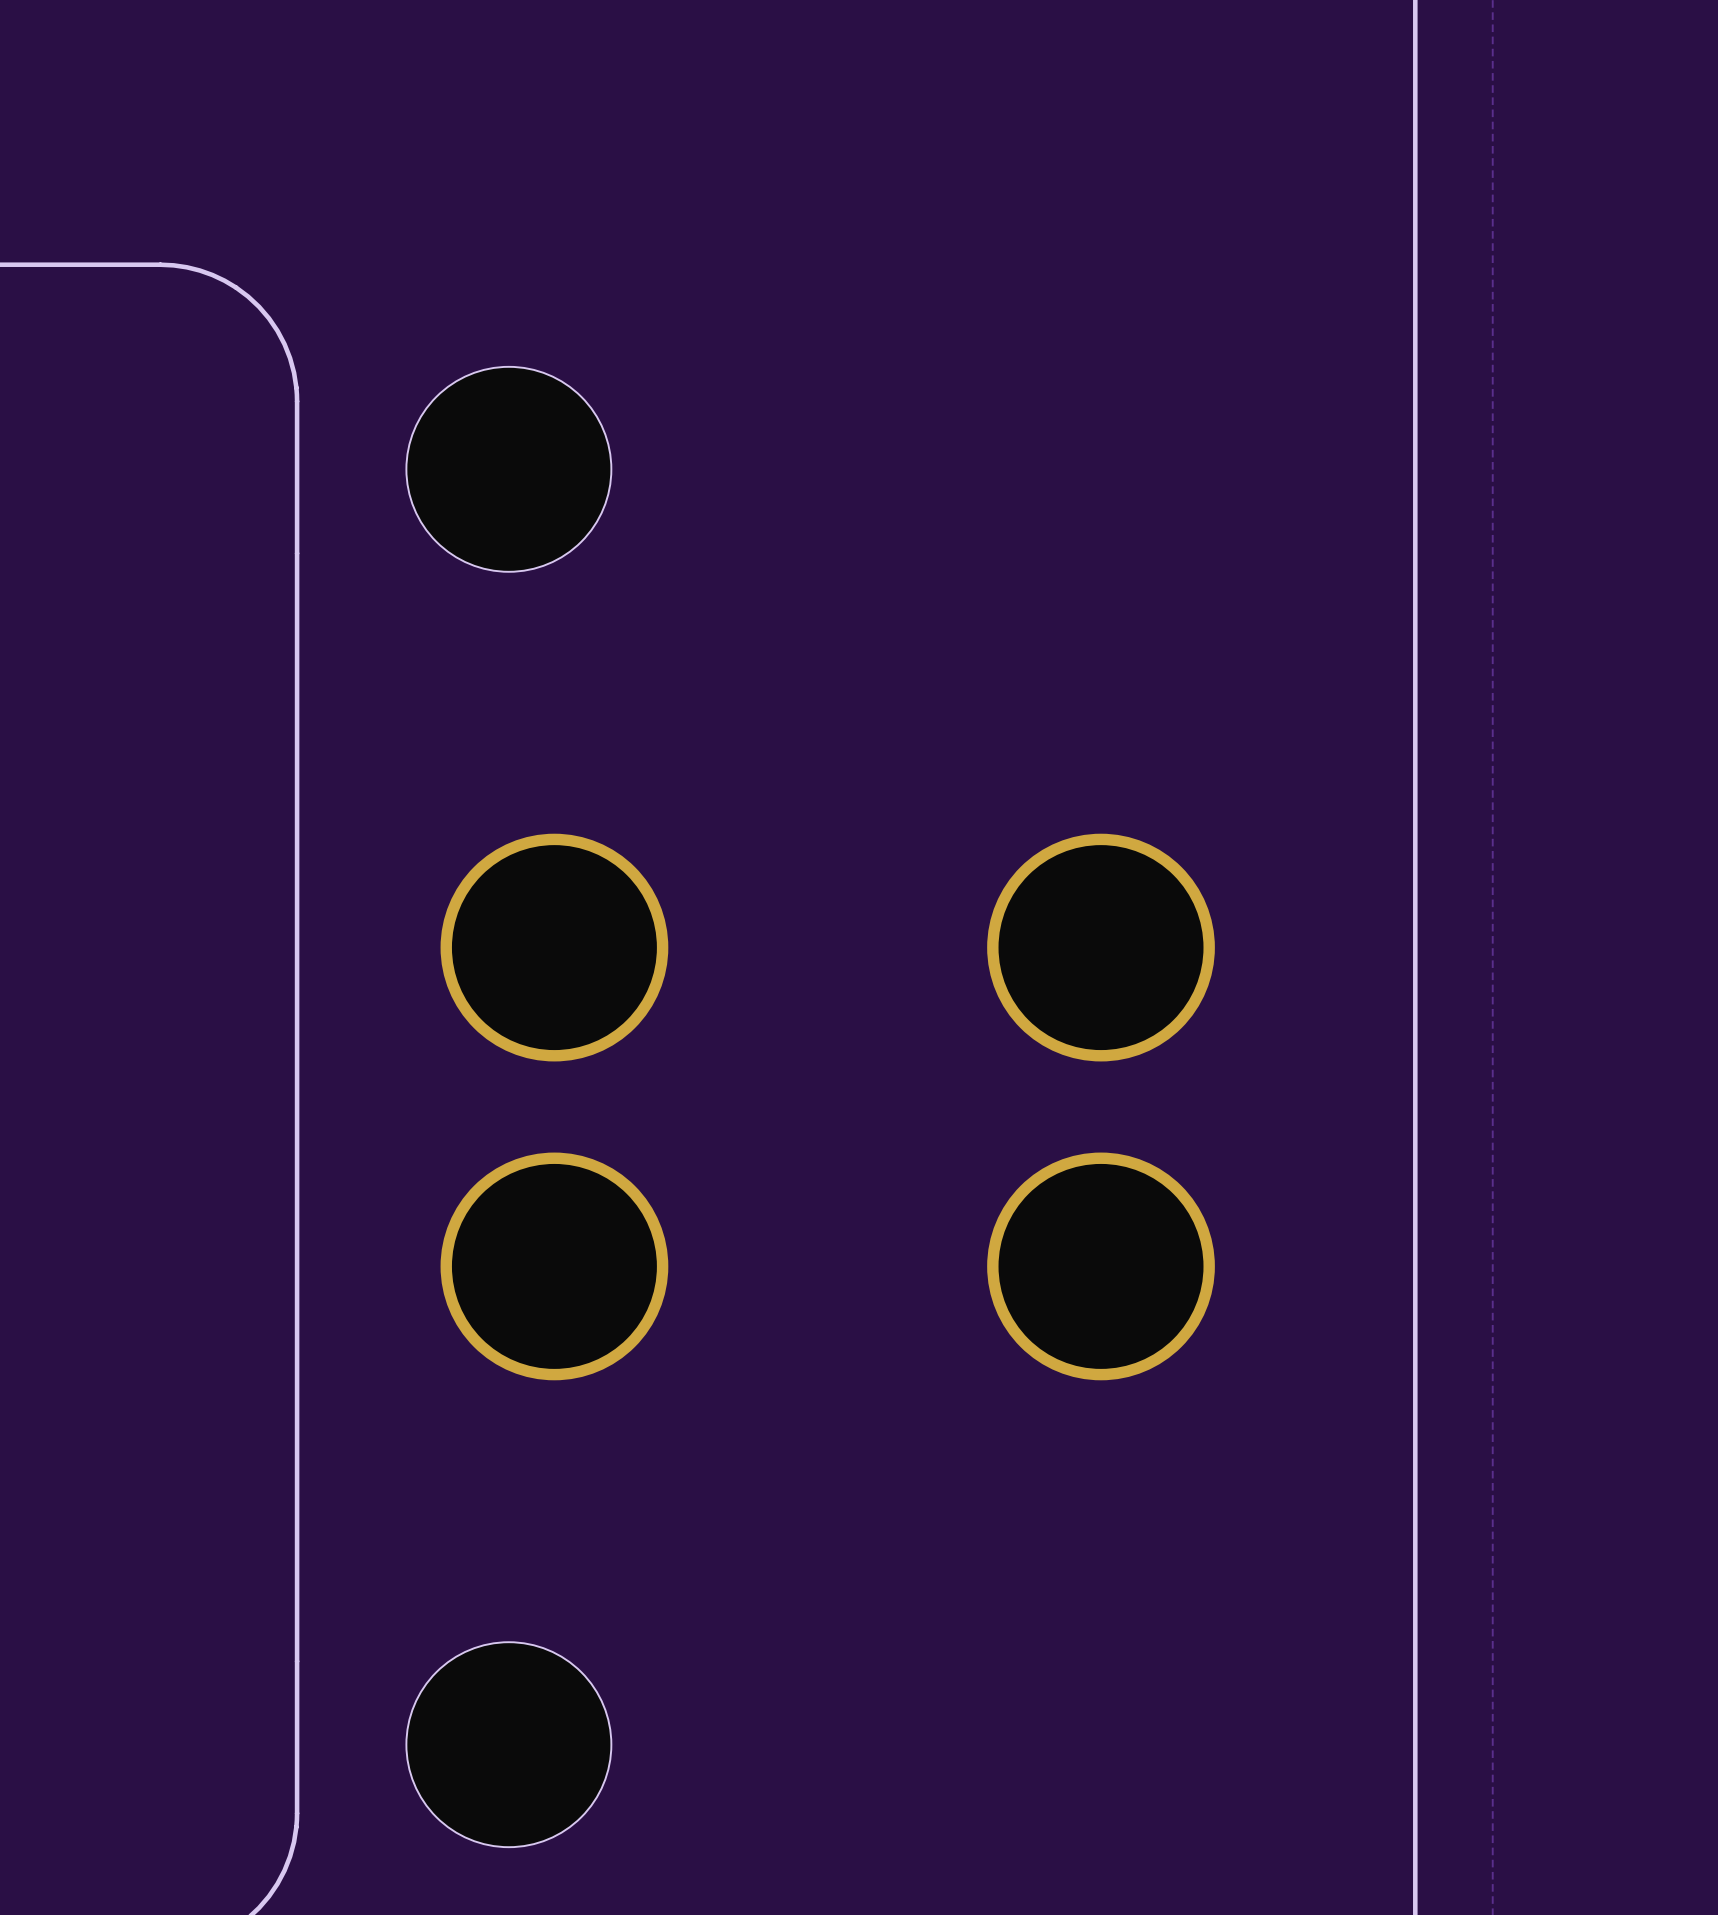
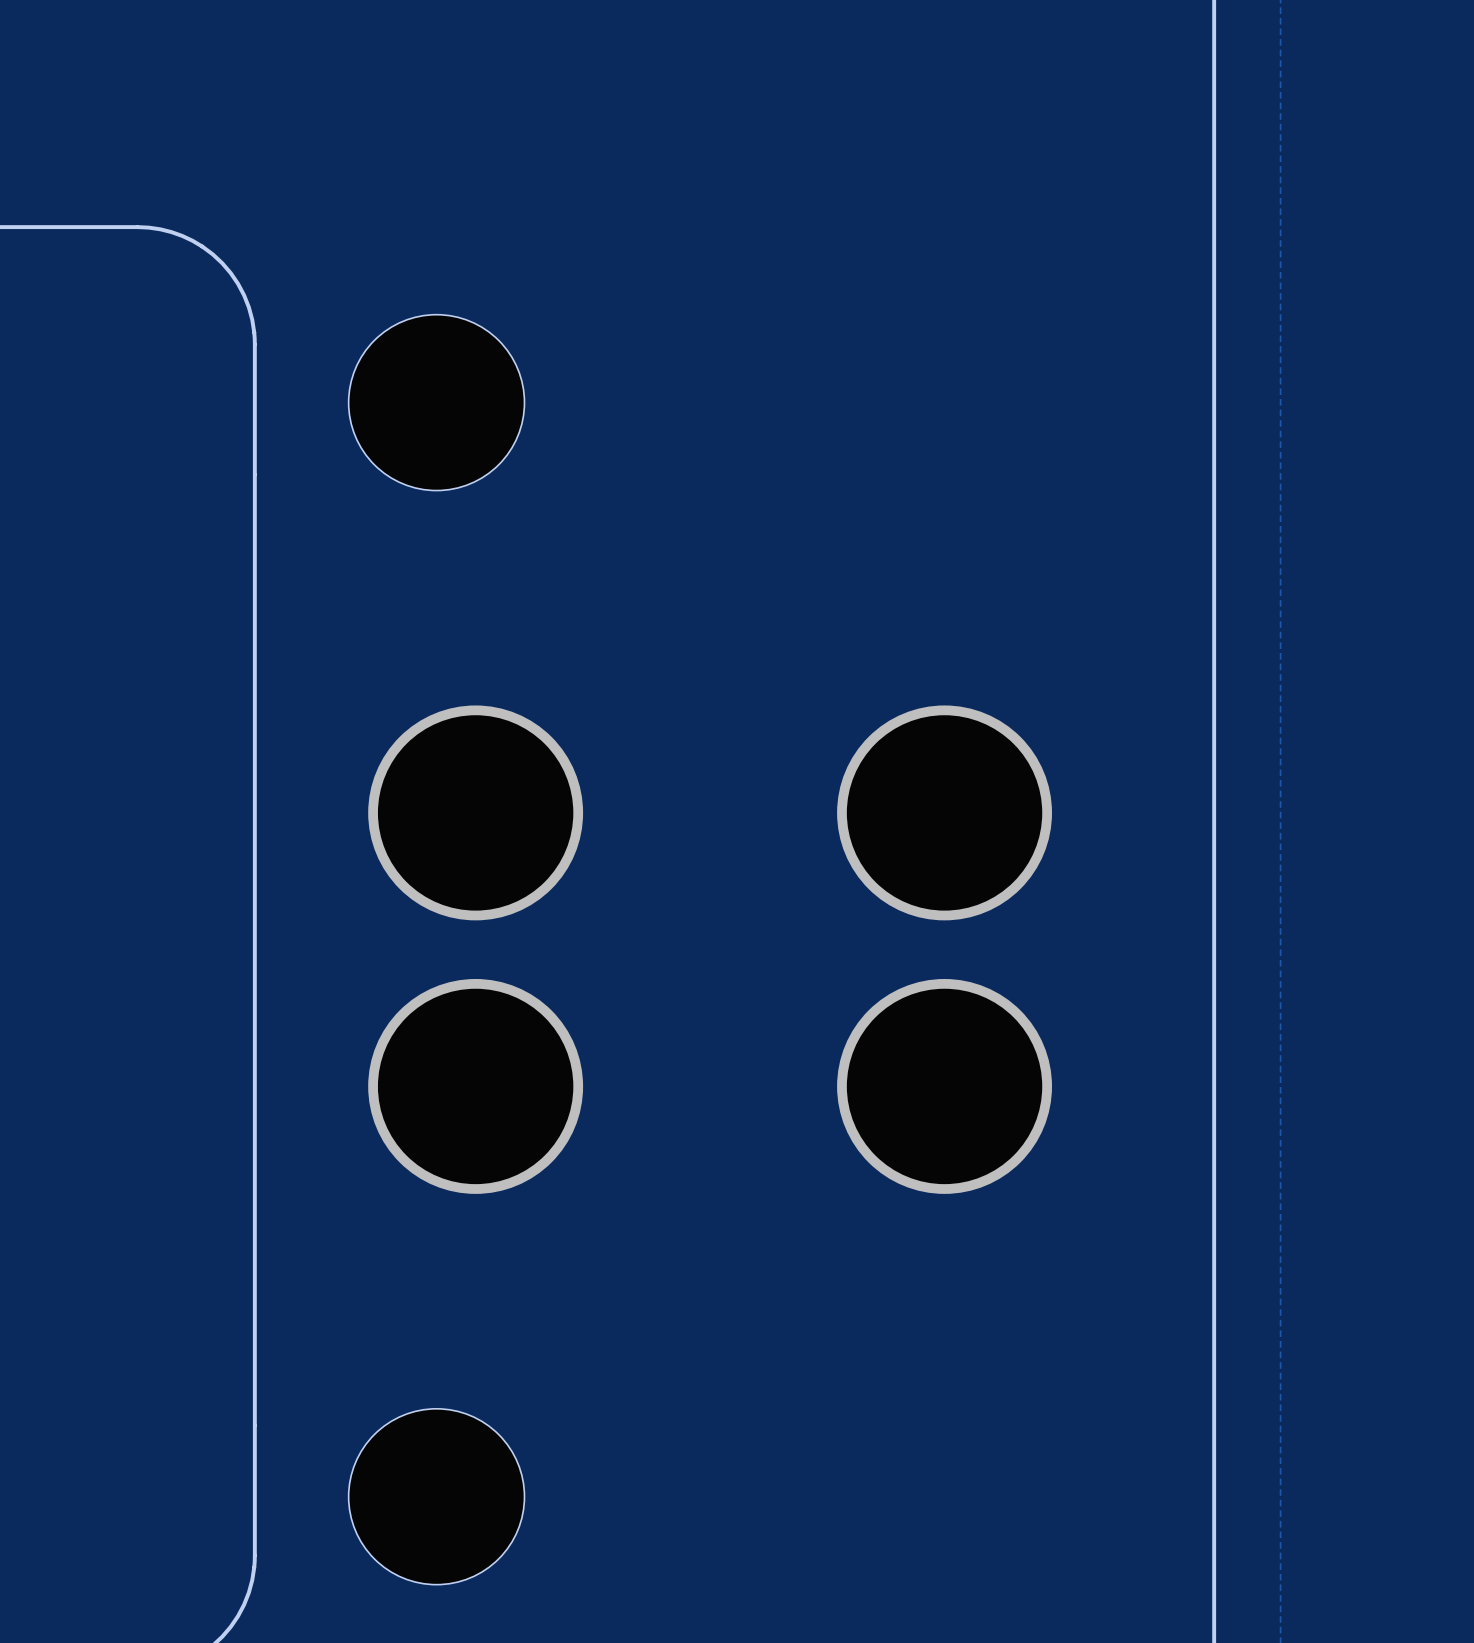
via size: [440, 833, 669, 1062] -> [368, 705, 584, 921]
via size: [987, 833, 1215, 1062] -> [837, 705, 1052, 921]
via size: [440, 1152, 669, 1381] -> [368, 978, 584, 1194]
via size: [987, 1152, 1215, 1381] -> [837, 978, 1052, 1194]

